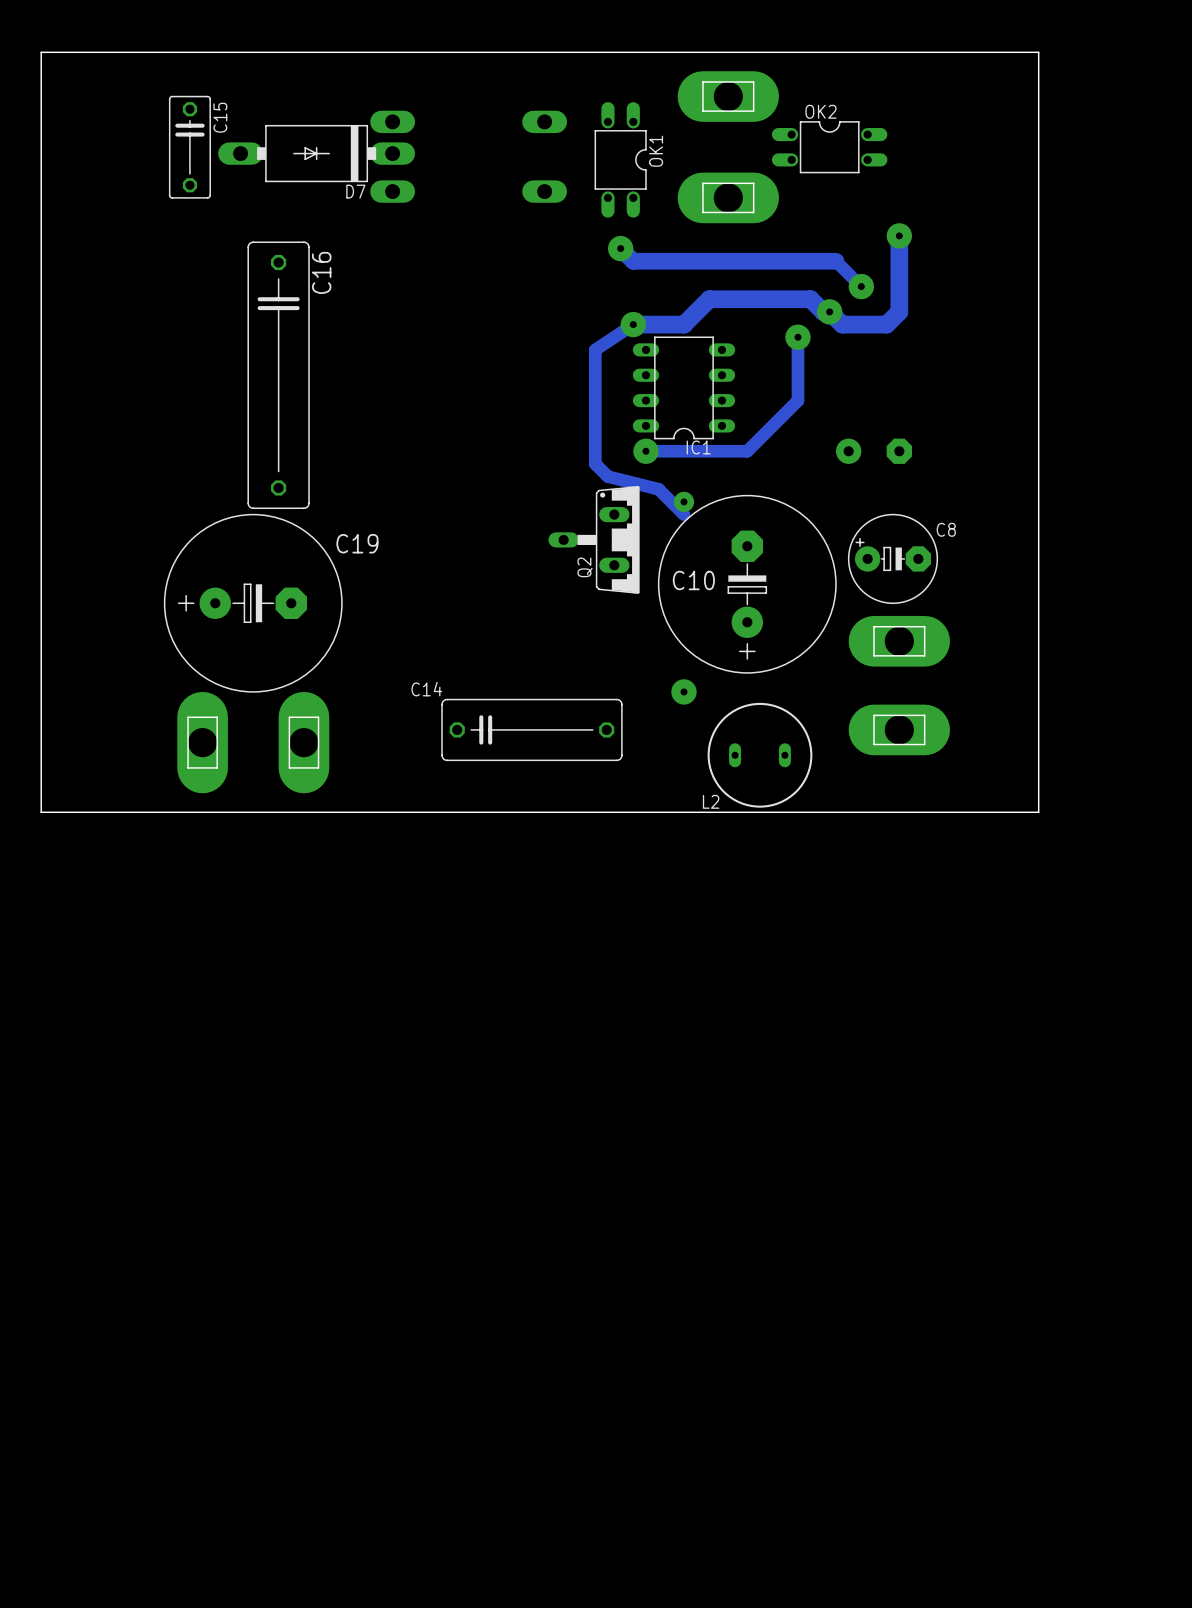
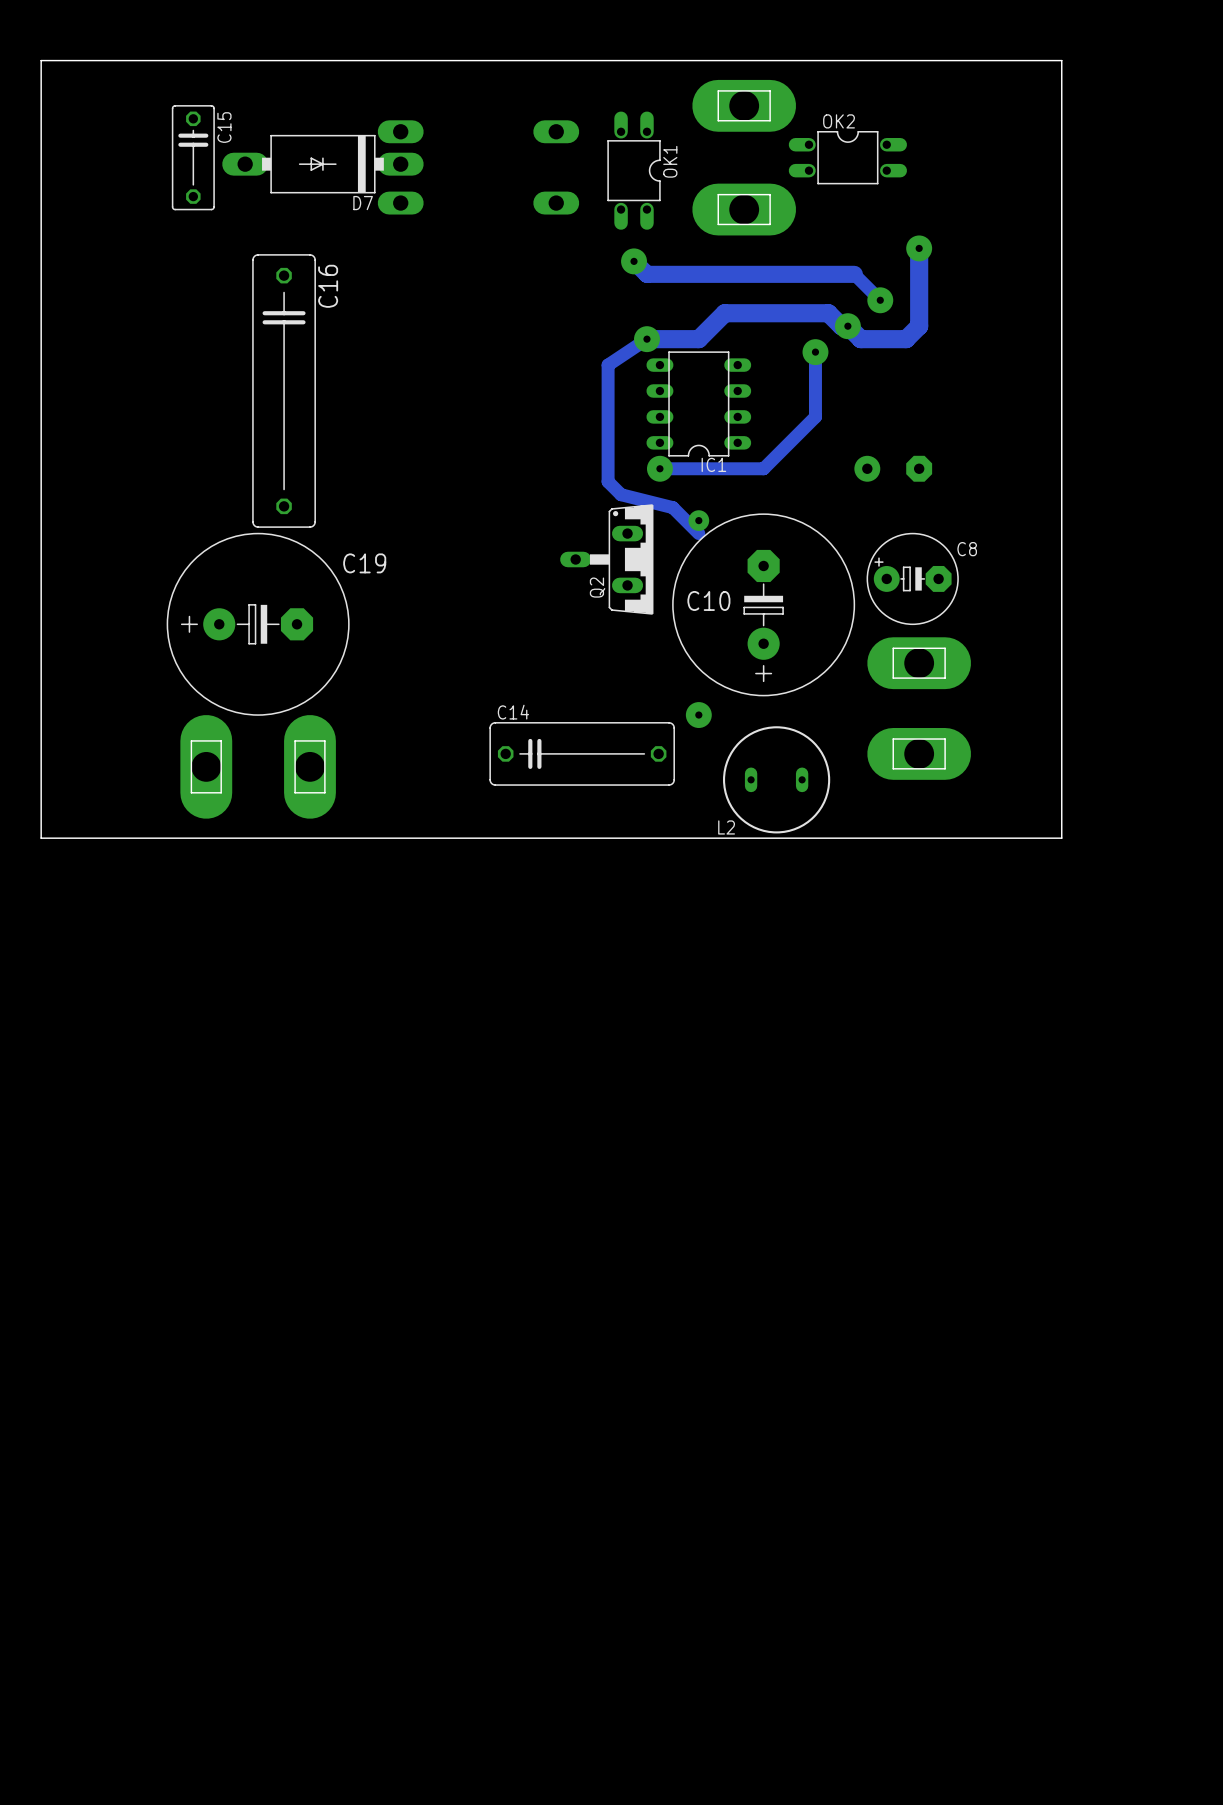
C14 name position: C14 (426, 689) -> C14 (513, 712)
C14 position: (531, 729) -> (582, 753)

